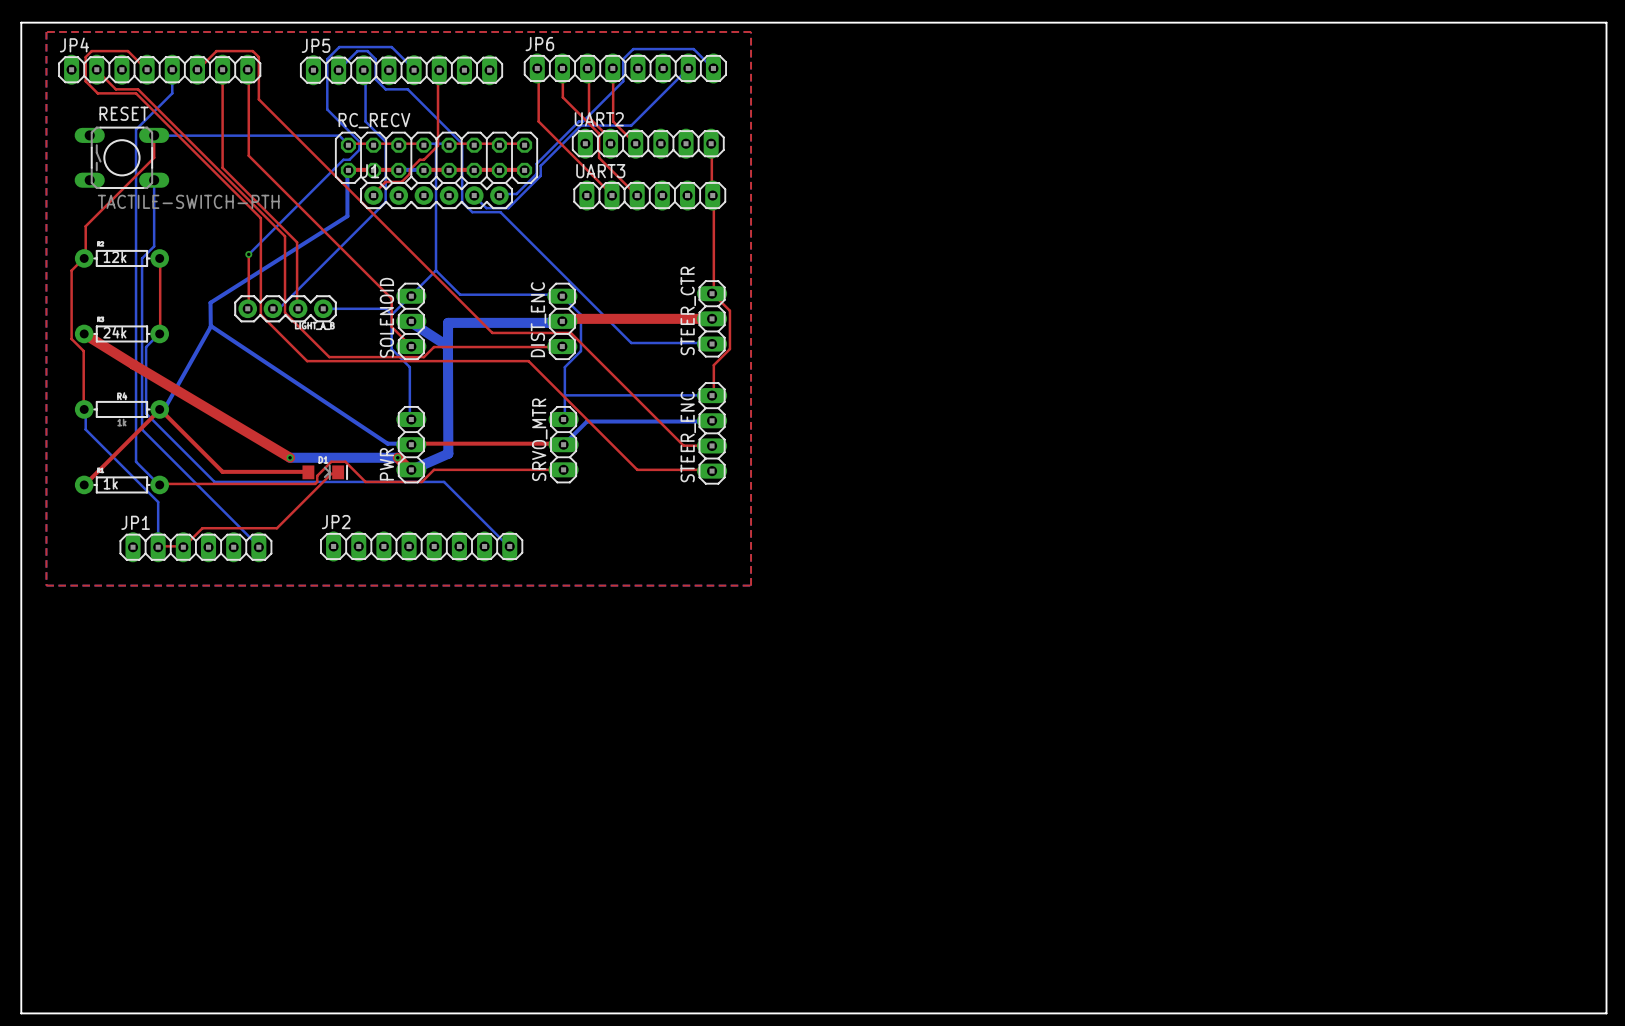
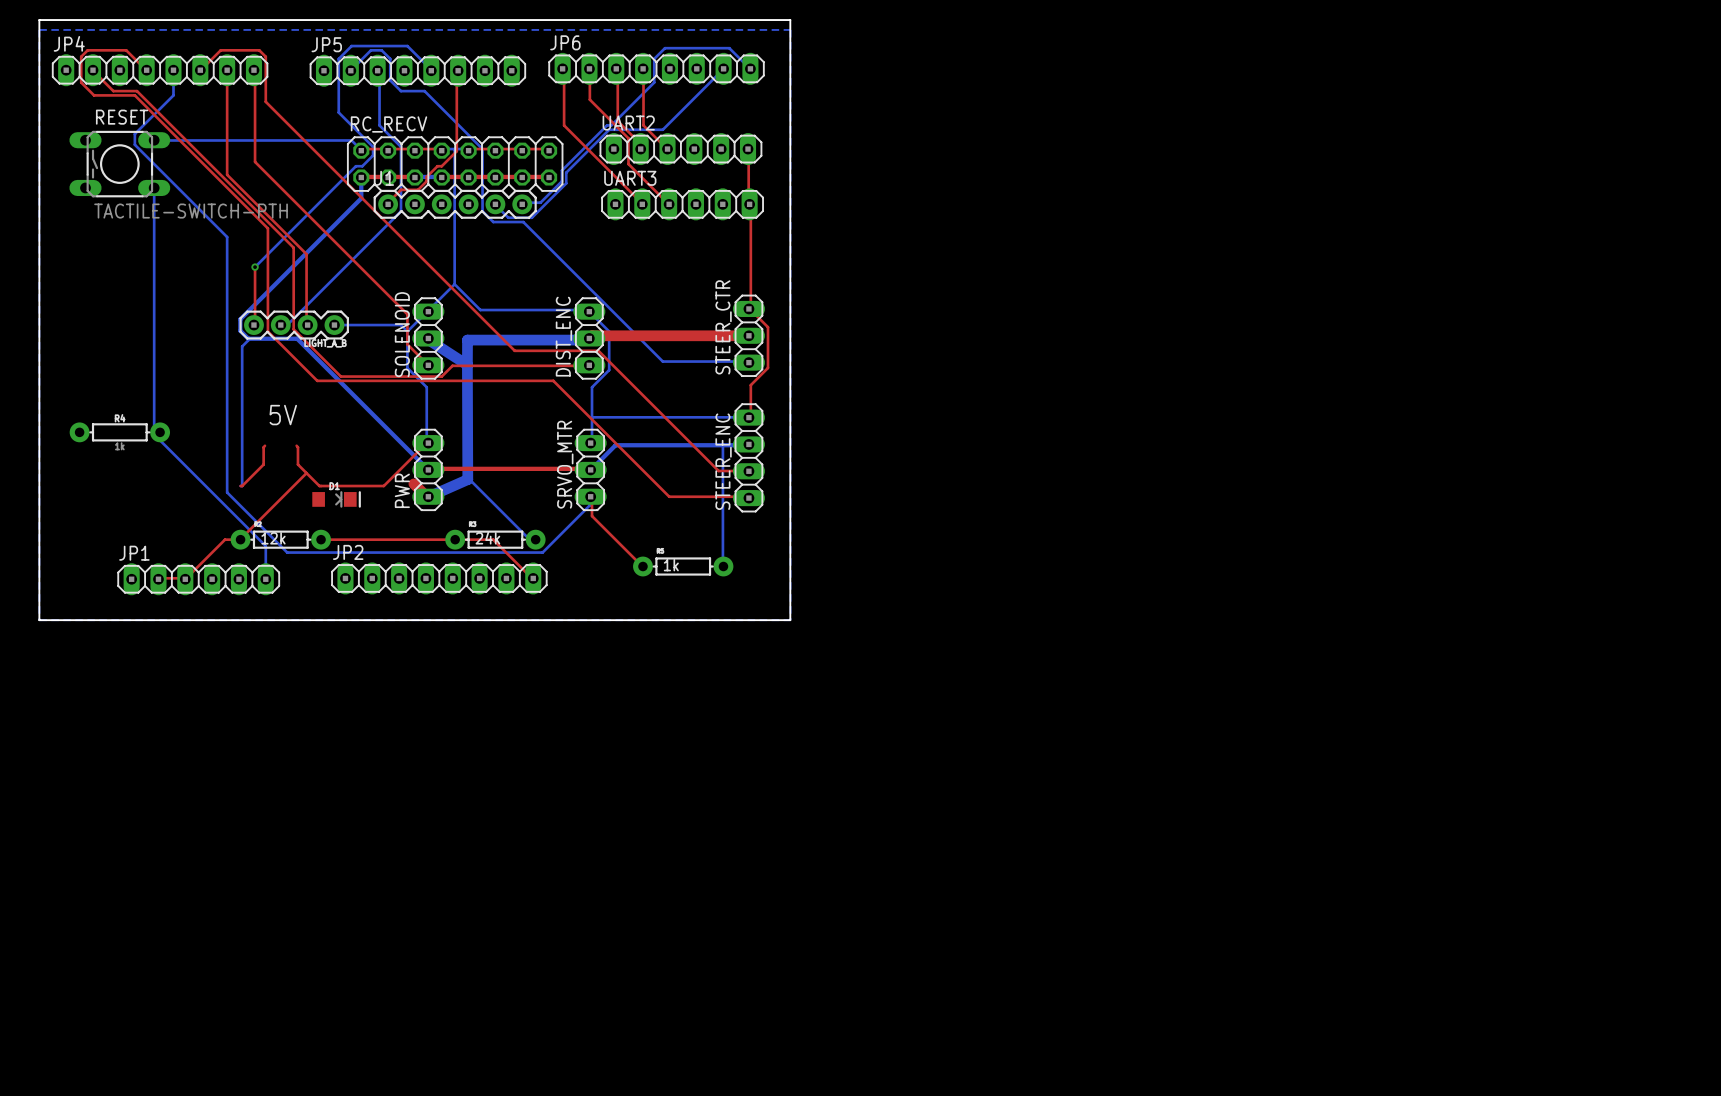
board edge: (46, 22) (21, 22) (21, 1013) (1606, 1013) (1606, 22) (750, 22) -> (39, 20) (39, 620) (790, 620) (790, 20)
top zone outline: (46, 31) (46, 585) (751, 585) (751, 31) (46, 31) -> none
top track: (154, 135) (154, 157) (85, 226) (85, 258) (71, 270) (71, 338) (83, 351) (84, 409) -> none
bottom track: (136, 139) (136, 461) (159, 484) -> (134, 144) (227, 237) (227, 492) (287, 552) (542, 552) (589, 505) (590, 496)
bottom track: (347, 171) (347, 216) (210, 302) (211, 326) -> none
bottom track: (154, 246) (142, 258) (142, 429) (258, 546) -> (154, 258) (154, 434) (265, 546) (265, 578)
part position: (121, 258) -> (280, 539)
top track: (159, 258) (159, 333) -> none
bottom track: none -> (248, 338) (242, 346) (242, 486) (240, 486)
bottom track: (211, 326) (387, 443) (411, 444) -> (361, 177) (361, 198) (240, 319) (240, 330) (248, 338) (297, 338) (428, 469)
bottom track: (211, 326) (164, 409) (159, 409) -> none
top track: (84, 333) (290, 457) -> none
part position: (121, 333) -> (495, 539)
bottom track: (159, 333) (146, 347) (146, 413) (214, 481) (444, 481) (509, 546) -> none
text: none -> 5V (283, 415)
bottom track: (84, 409) (85, 409) (85, 429) (158, 502) (158, 547) -> none
top track: (160, 409) (222, 471) (308, 472) -> none
top track: (160, 409) (84, 484) -> none
top track: none -> (428, 443) (383, 486) (319, 486) (297, 464) (296, 445)
bottom track: none -> (722, 445) (723, 566)
top track: none -> (264, 445) (263, 464) (240, 486)
top track: none -> (306, 473) (240, 539)
bottom track: none -> (467, 479) (529, 539) (535, 539)
bottom track: (290, 457) (397, 457) -> none
via: (290, 457) -> none
via: (397, 457) -> none
top track: (563, 469) (433, 469) (421, 481) (365, 481) (345, 461) (331, 461) (317, 475) (315, 483) (159, 484) -> (590, 496) (592, 516) (642, 566)
top track: (338, 472) (331, 473) (276, 528) (202, 528) -> (240, 539) (225, 539) (205, 558)
part: 1k (121, 484) -> none
top track: none -> (321, 539) (493, 539) (533, 578)
part: none -> 1k (683, 566)

